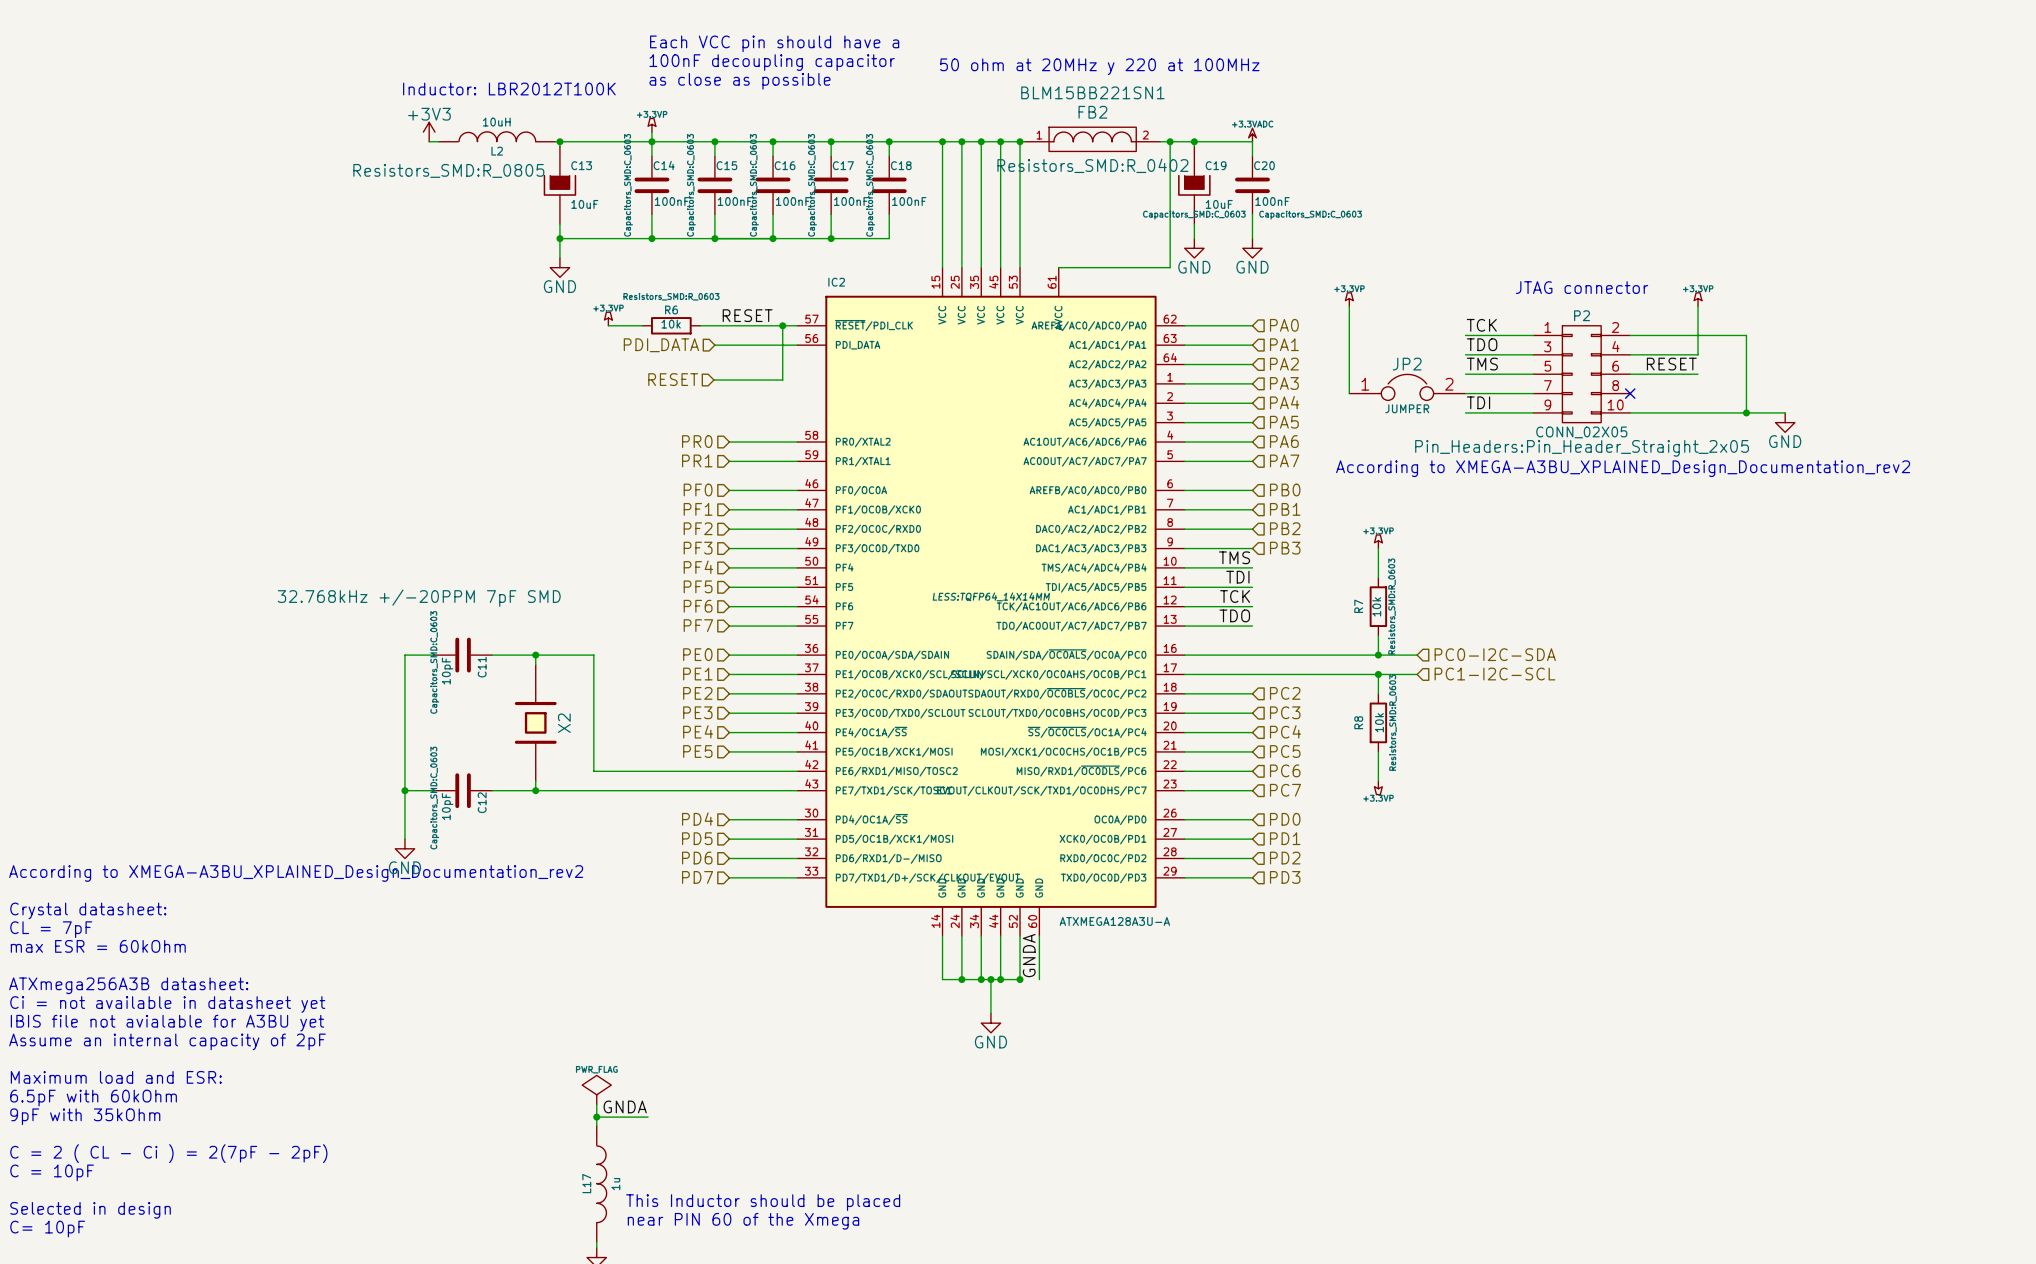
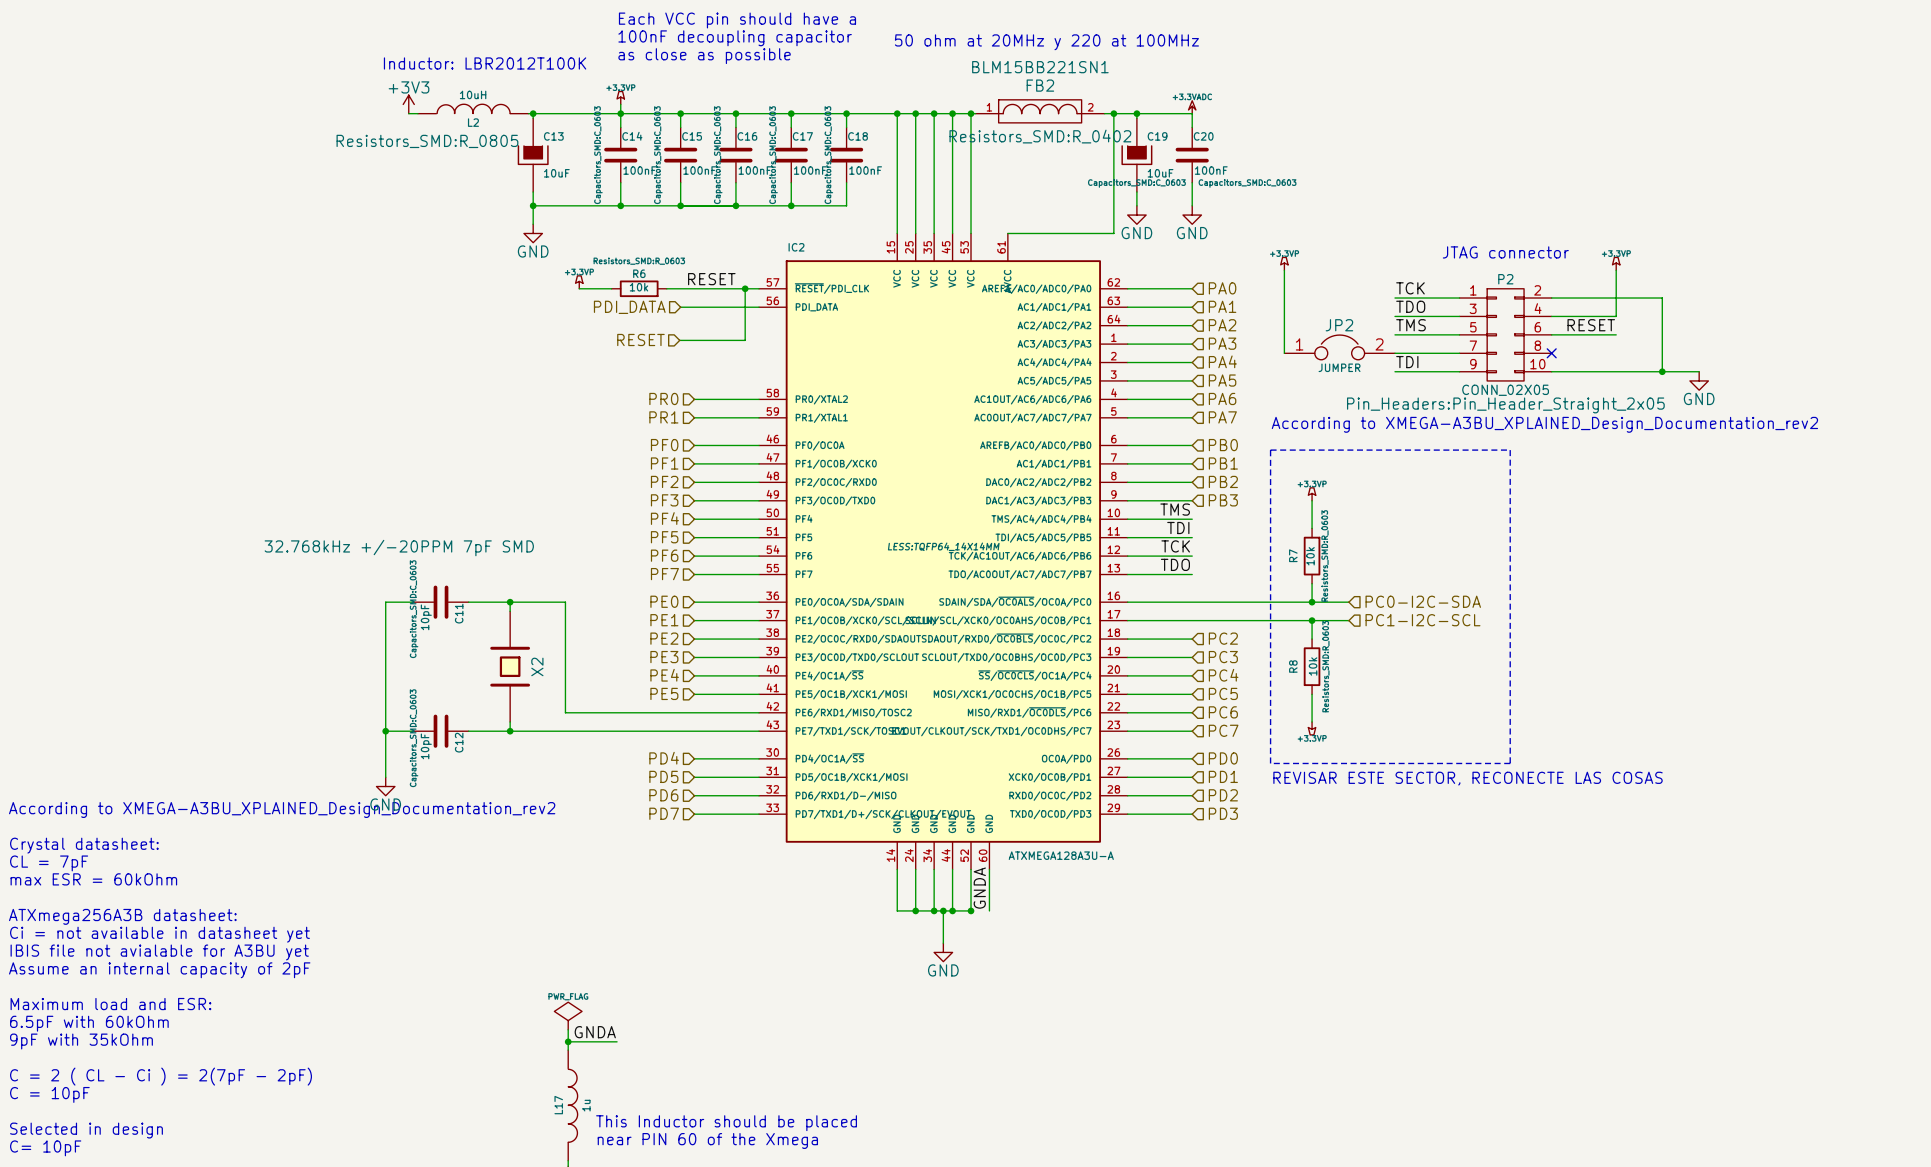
line: none -> (1270, 450) (1270, 763) (1510, 763) (1510, 450) (1270, 450)
text: none -> REVISAR ESTE SECTOR, RECONECTE LAS COSAS (1468, 778)

